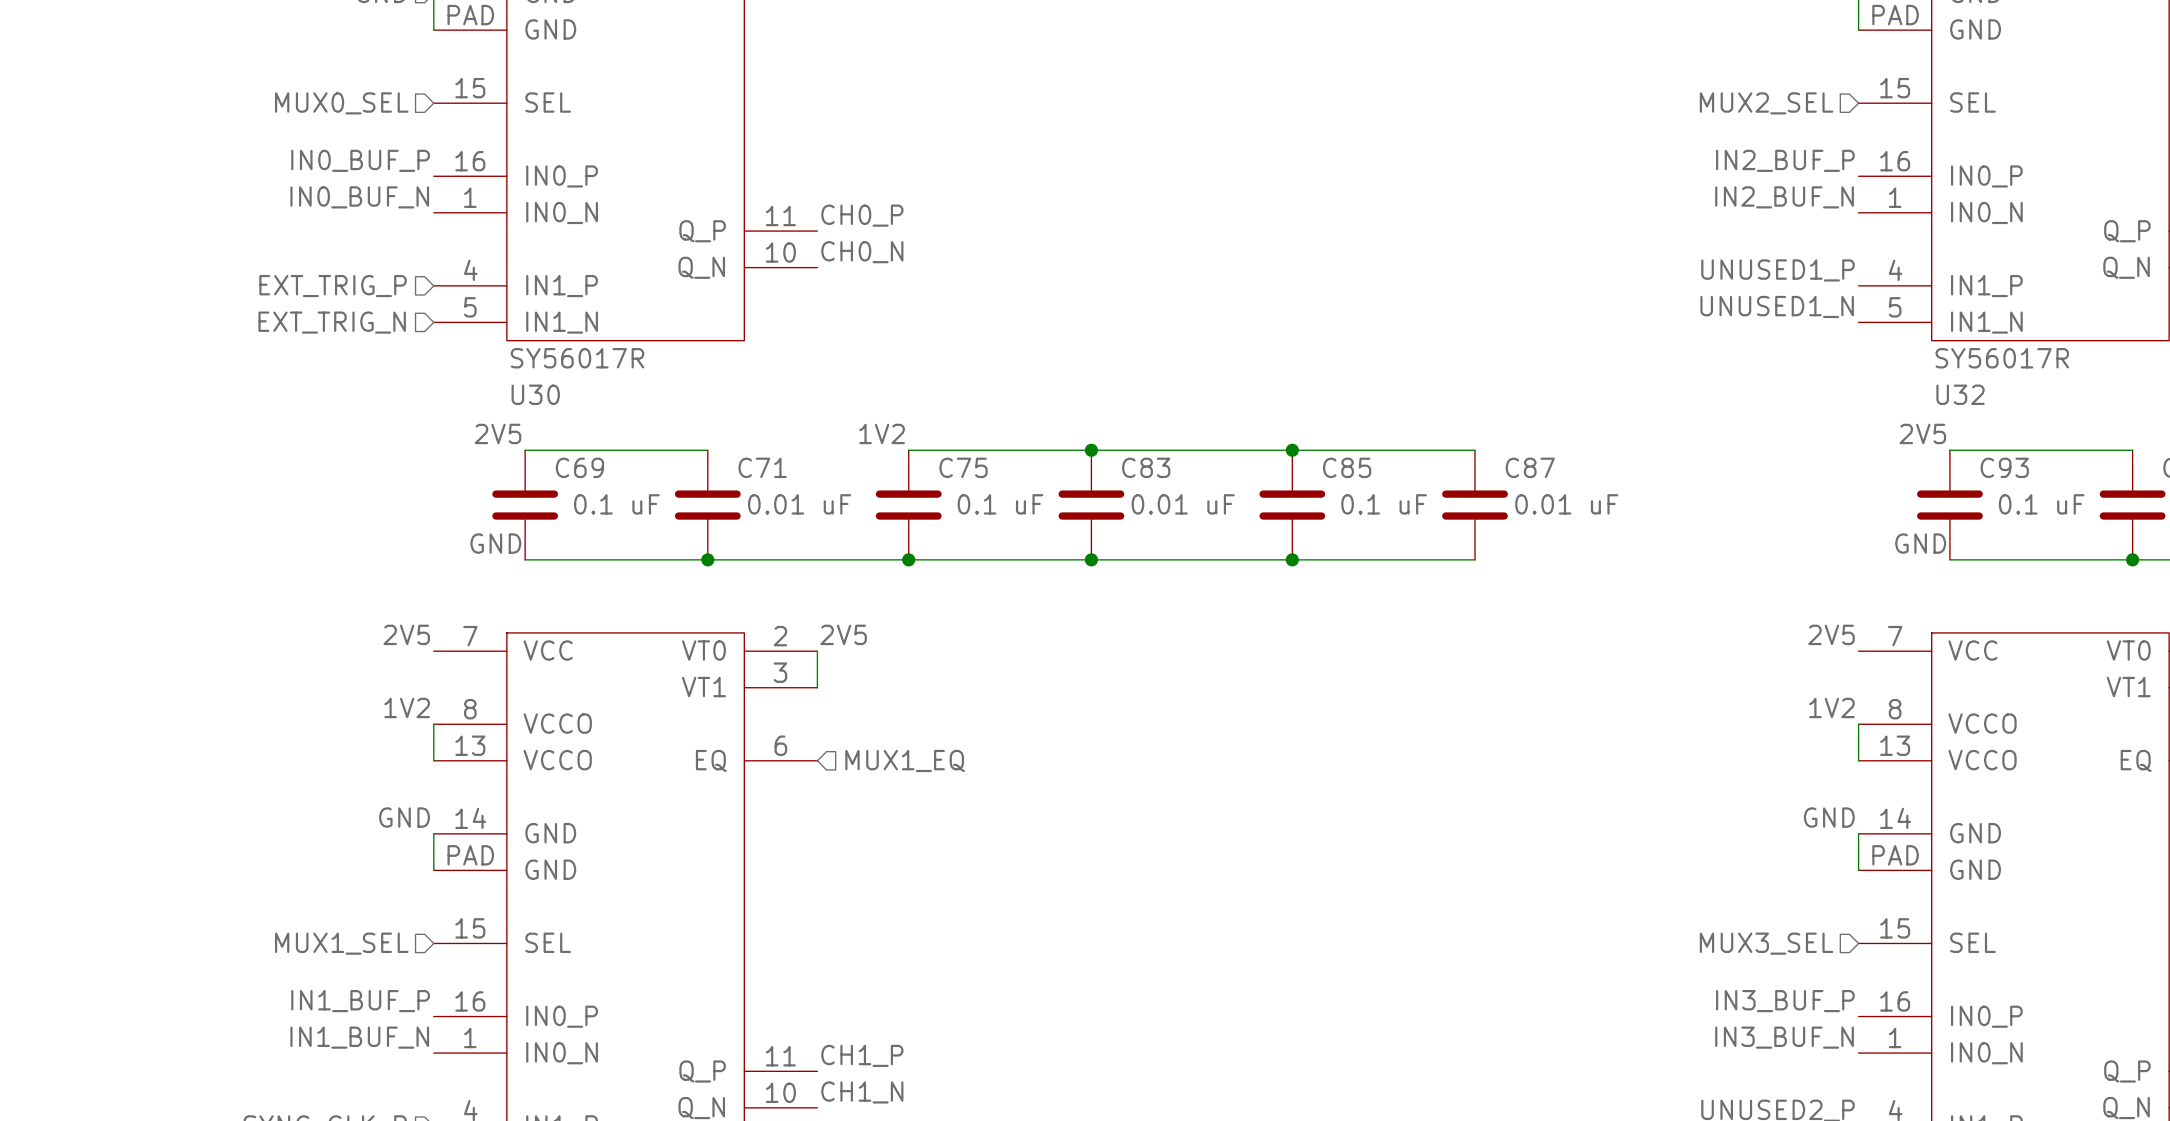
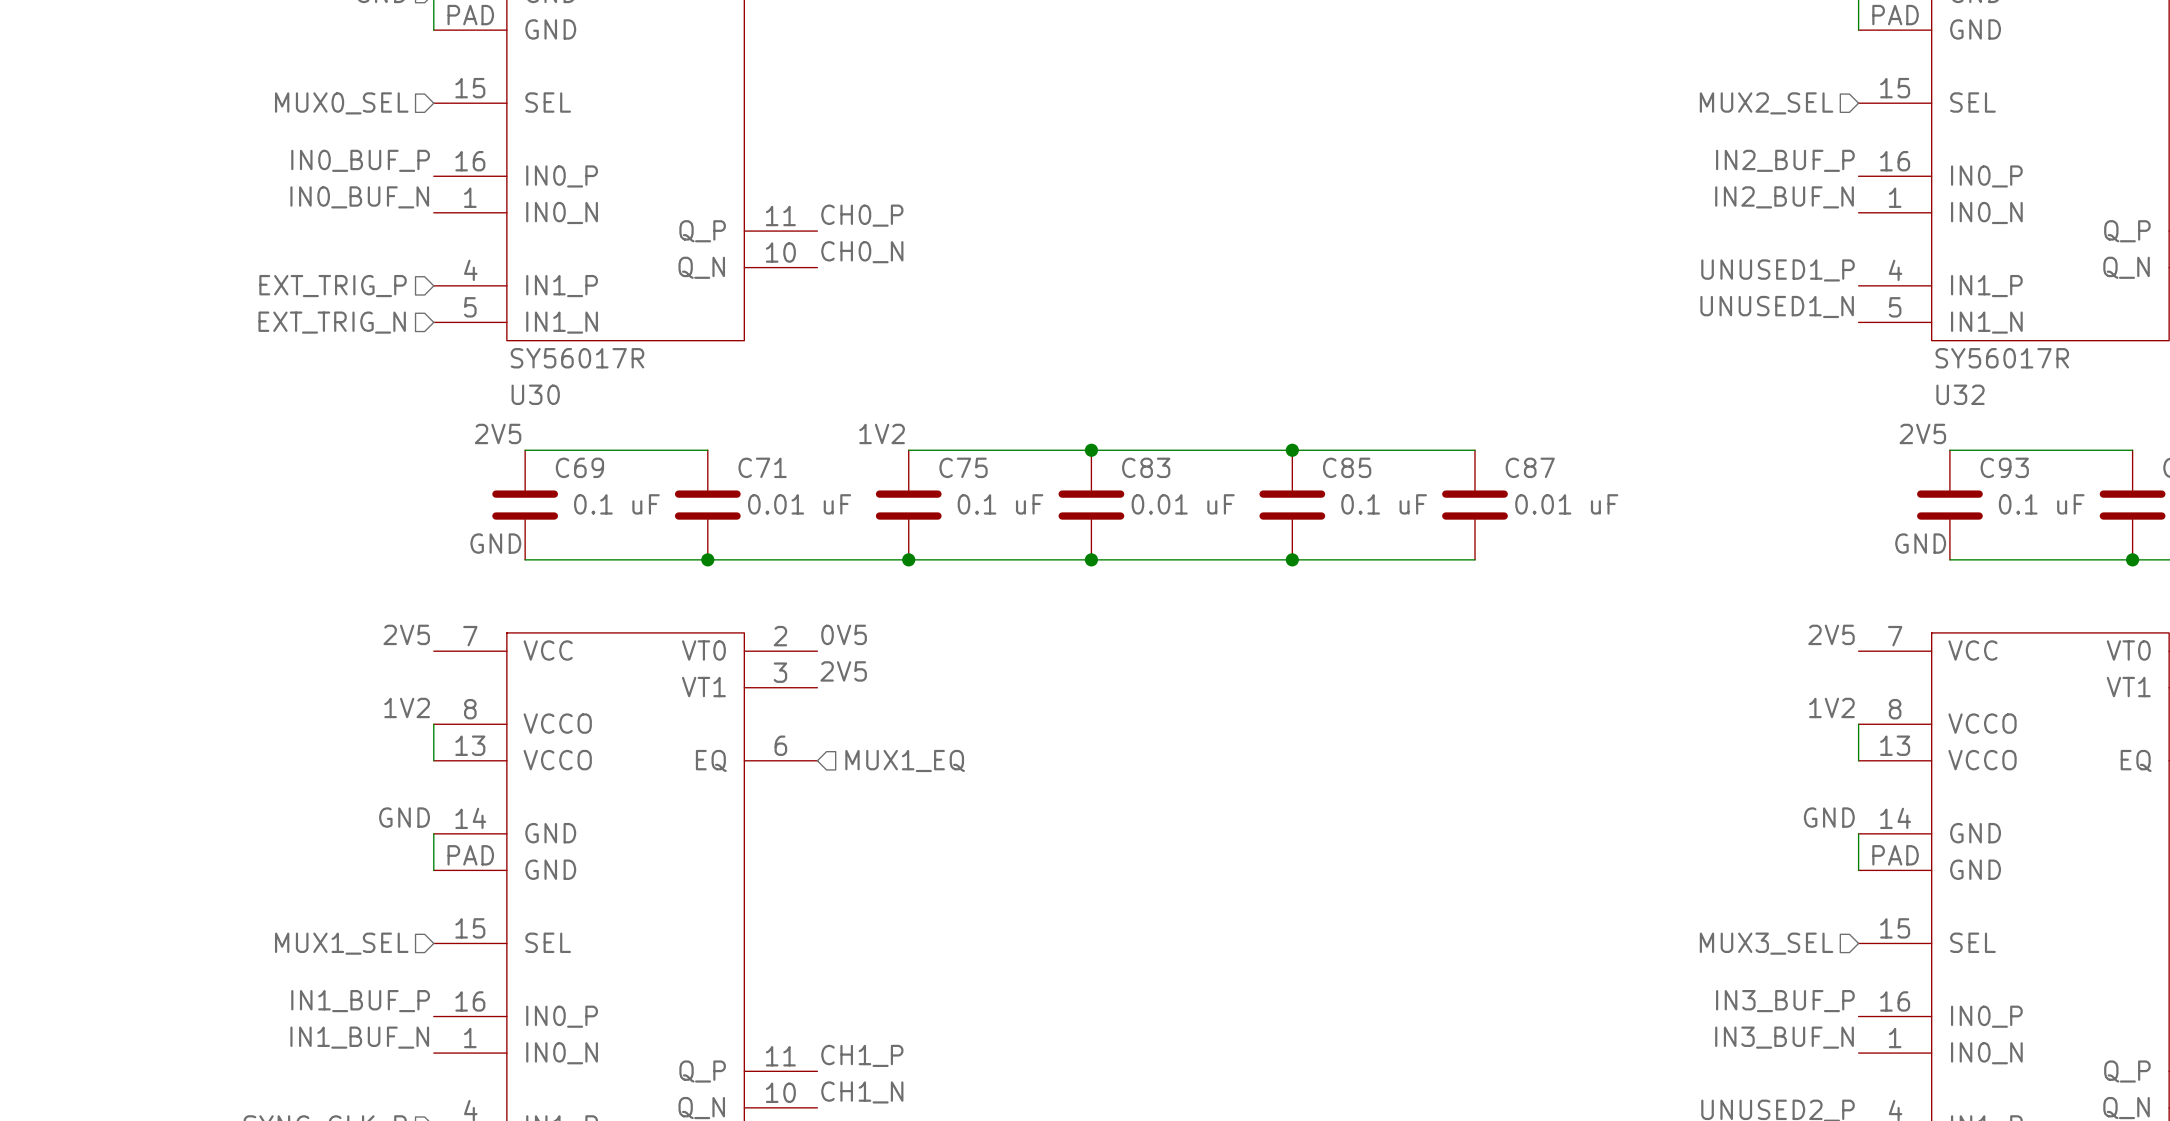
label: 2V5 (843, 634) -> 0V5 (844, 634)
wire: (817, 651) (817, 687) -> none
label: none -> 2V5 (843, 671)

